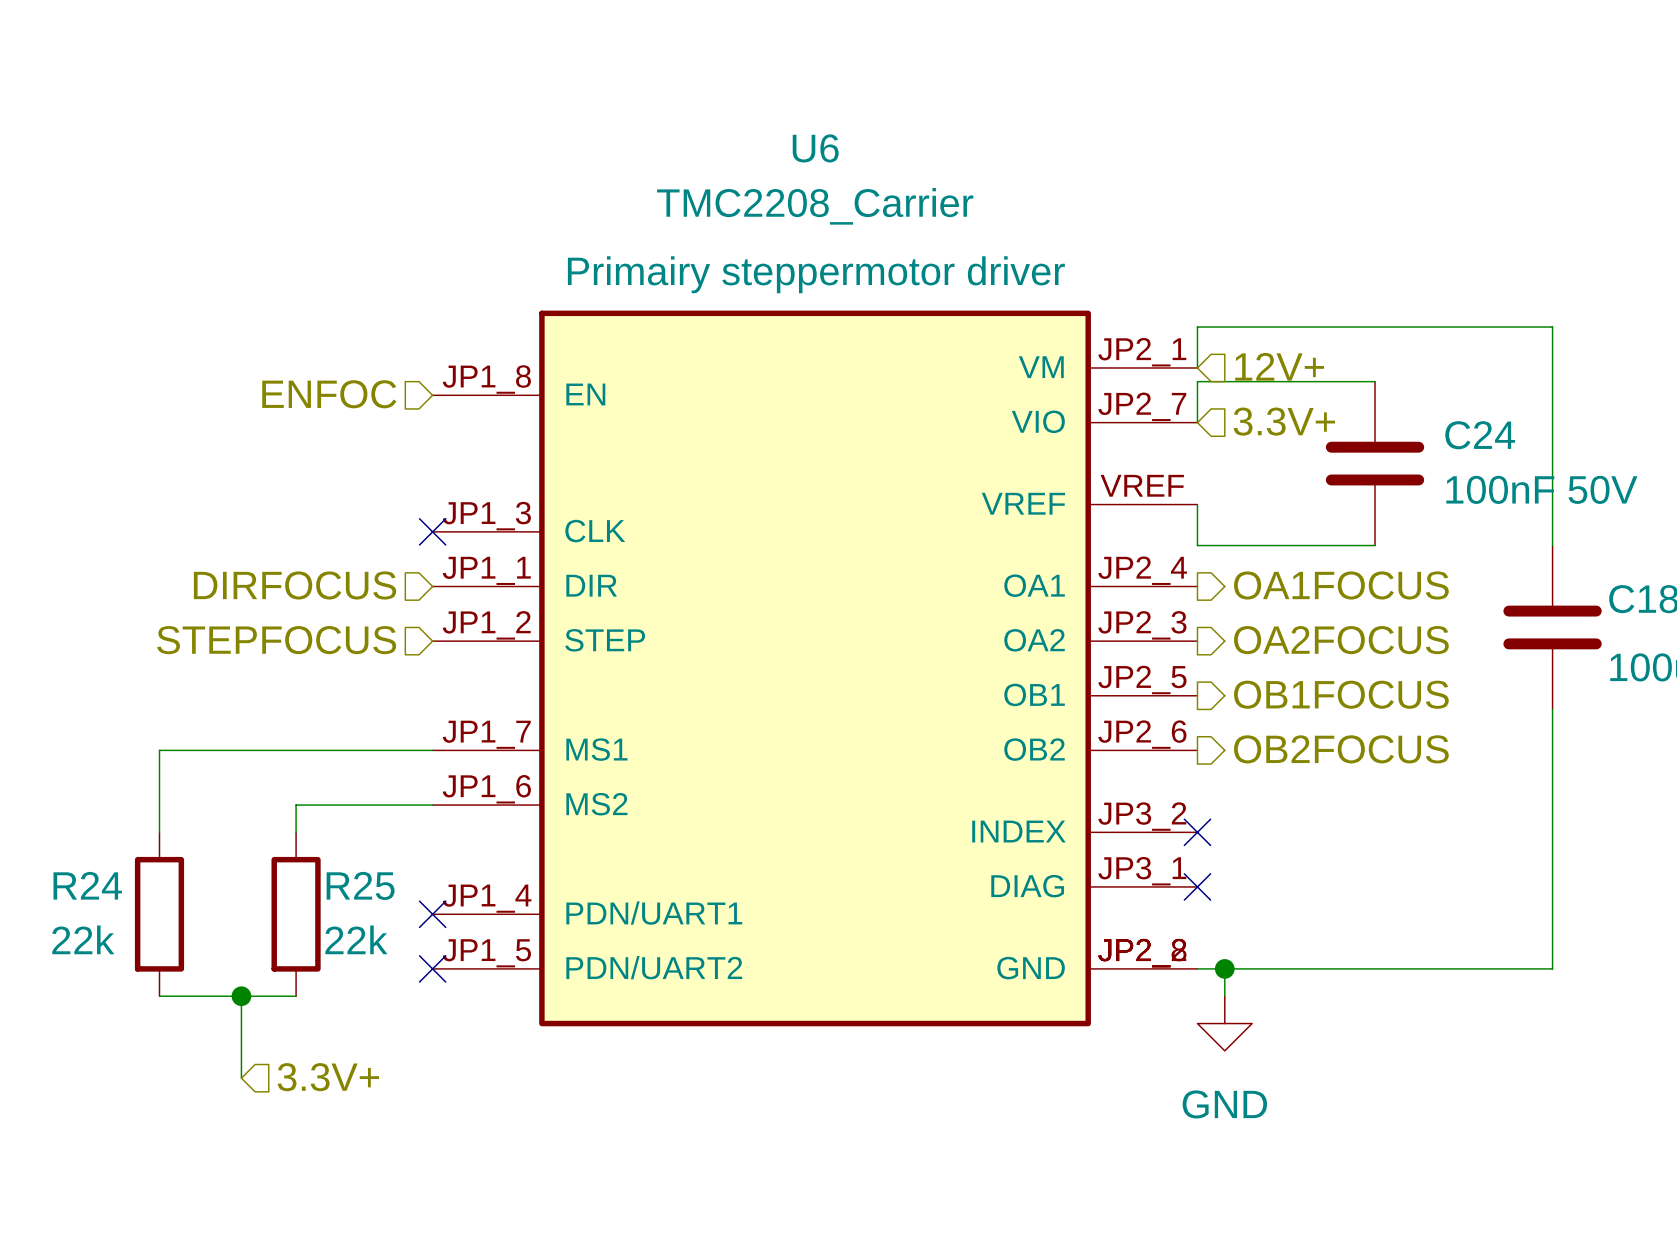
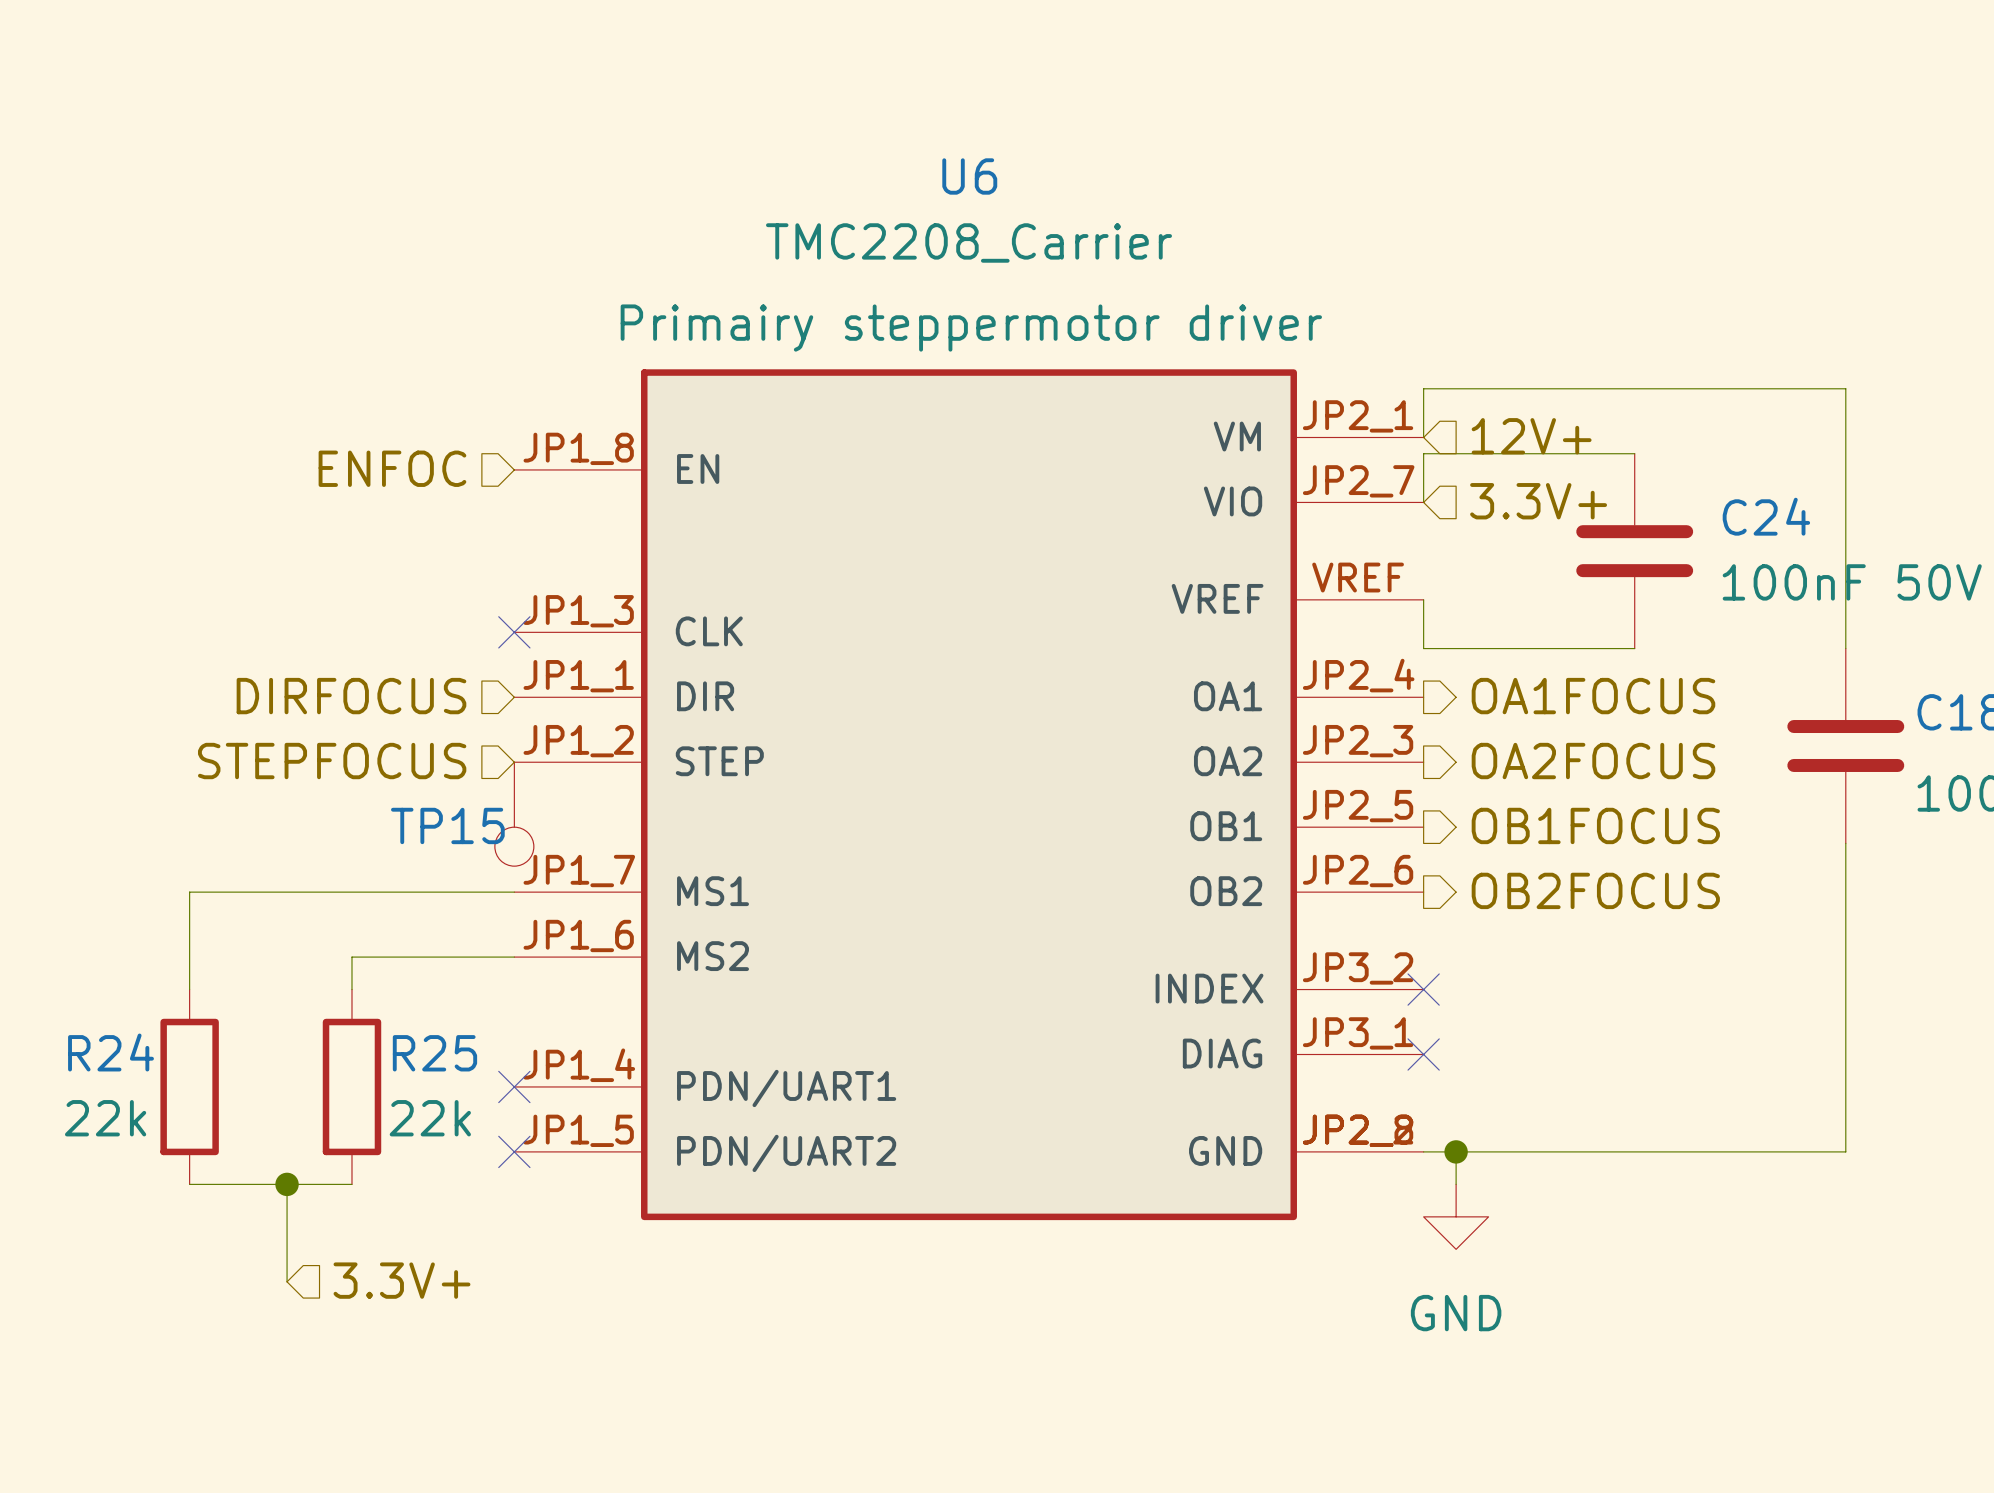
TP15: none -> (514, 814)

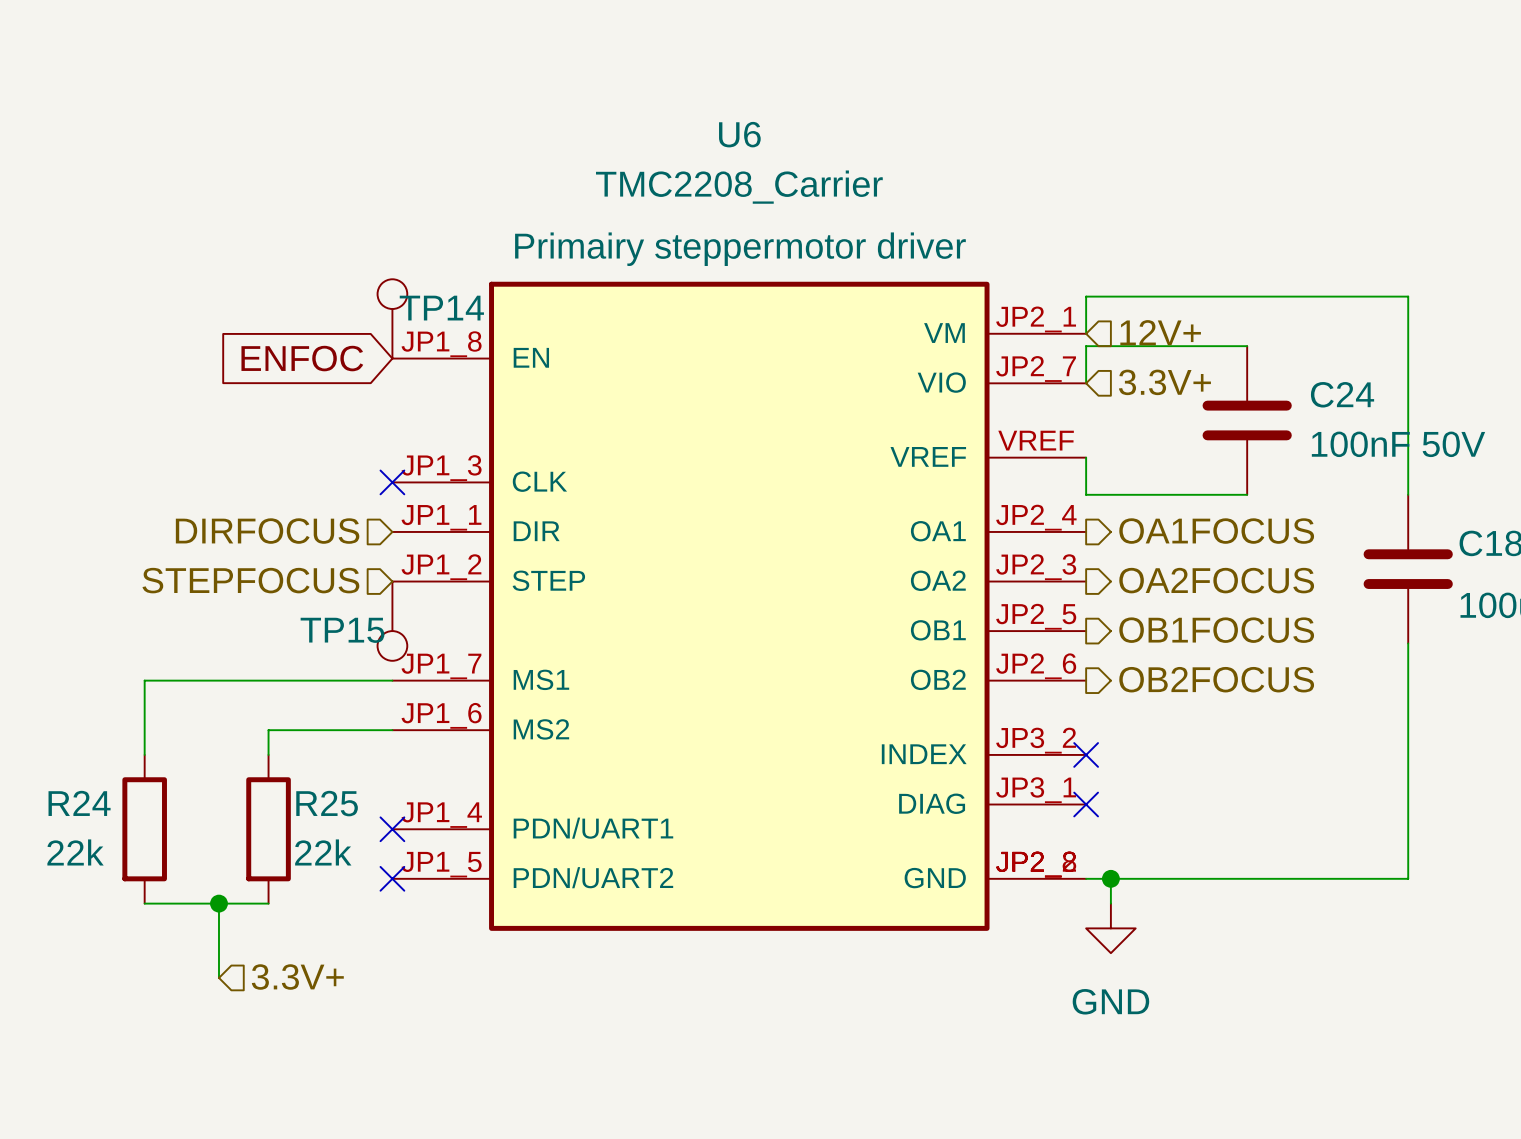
TP14: none -> (392, 318)
hierarchical label: ENFOC (392, 468) -> none
global label: none -> ENFOC (302, 358)

